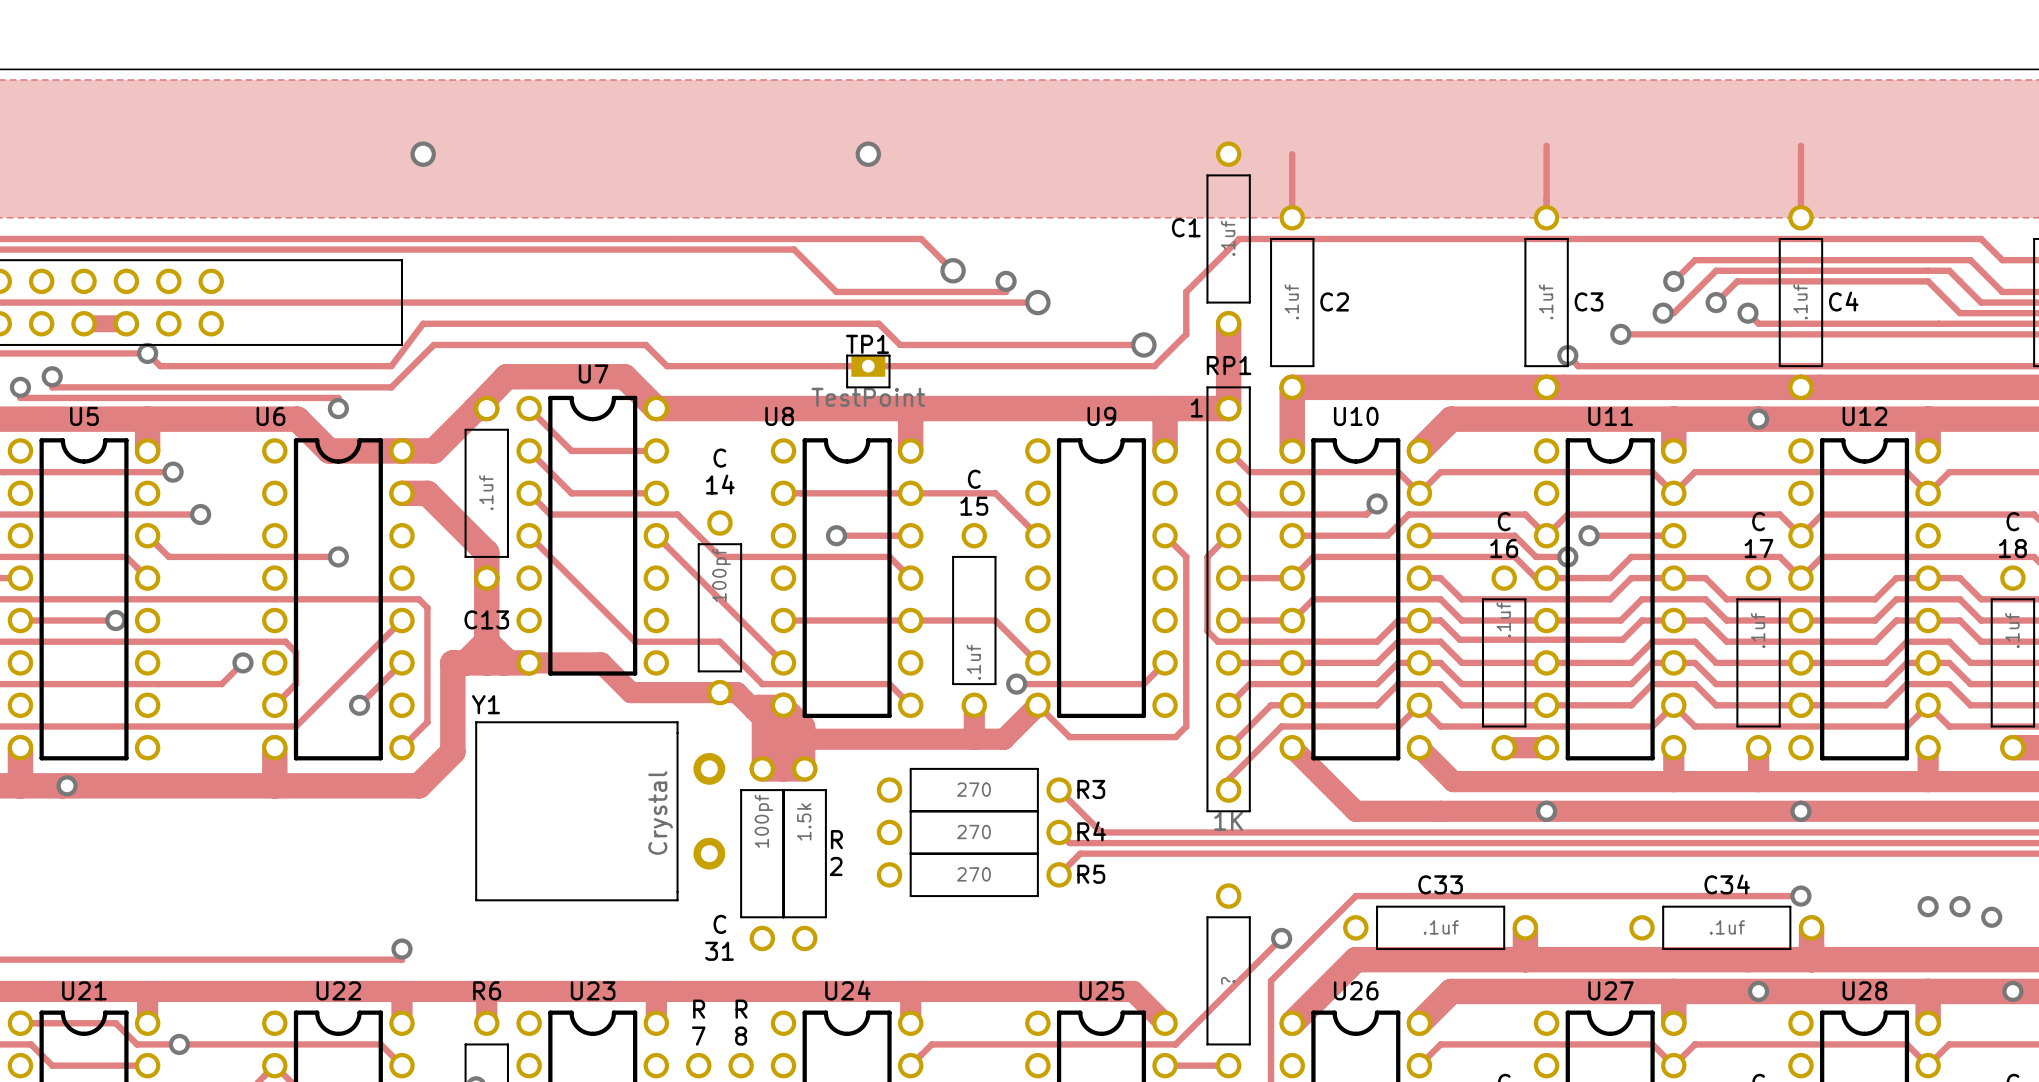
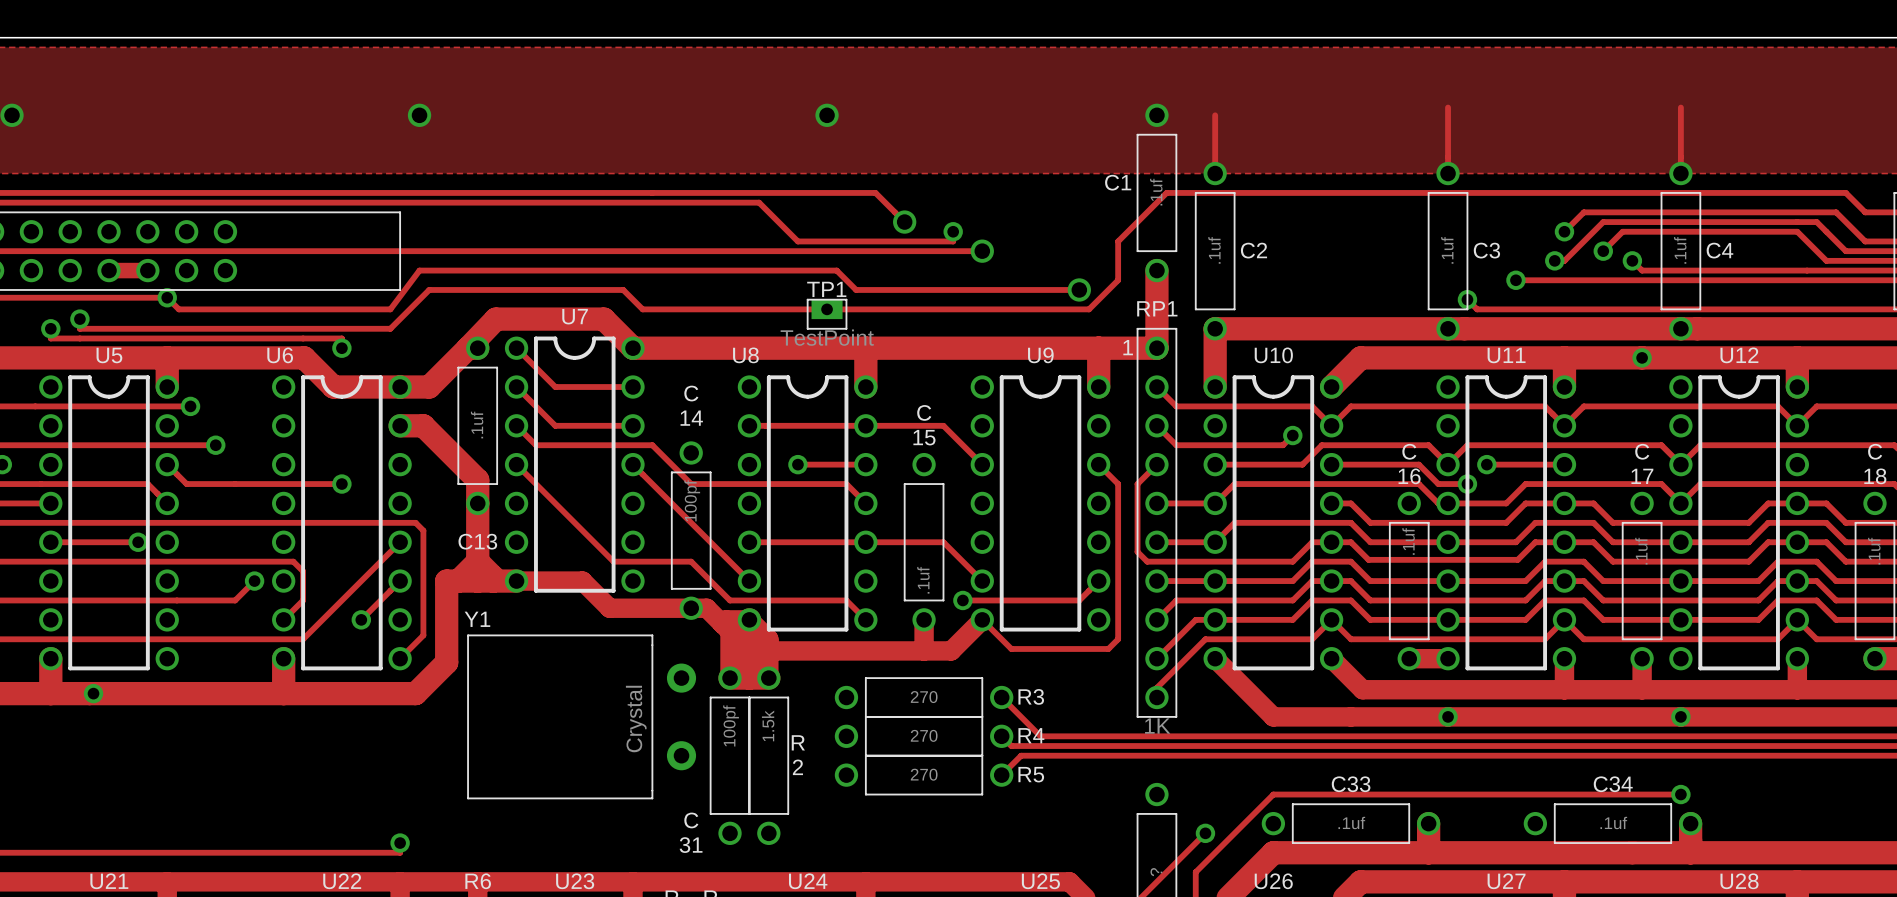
via: (1928, 906) -> none
via: (1959, 906) -> none
via: (1991, 917) -> none
via: (1758, 991) -> none
via: (2012, 991) -> none

